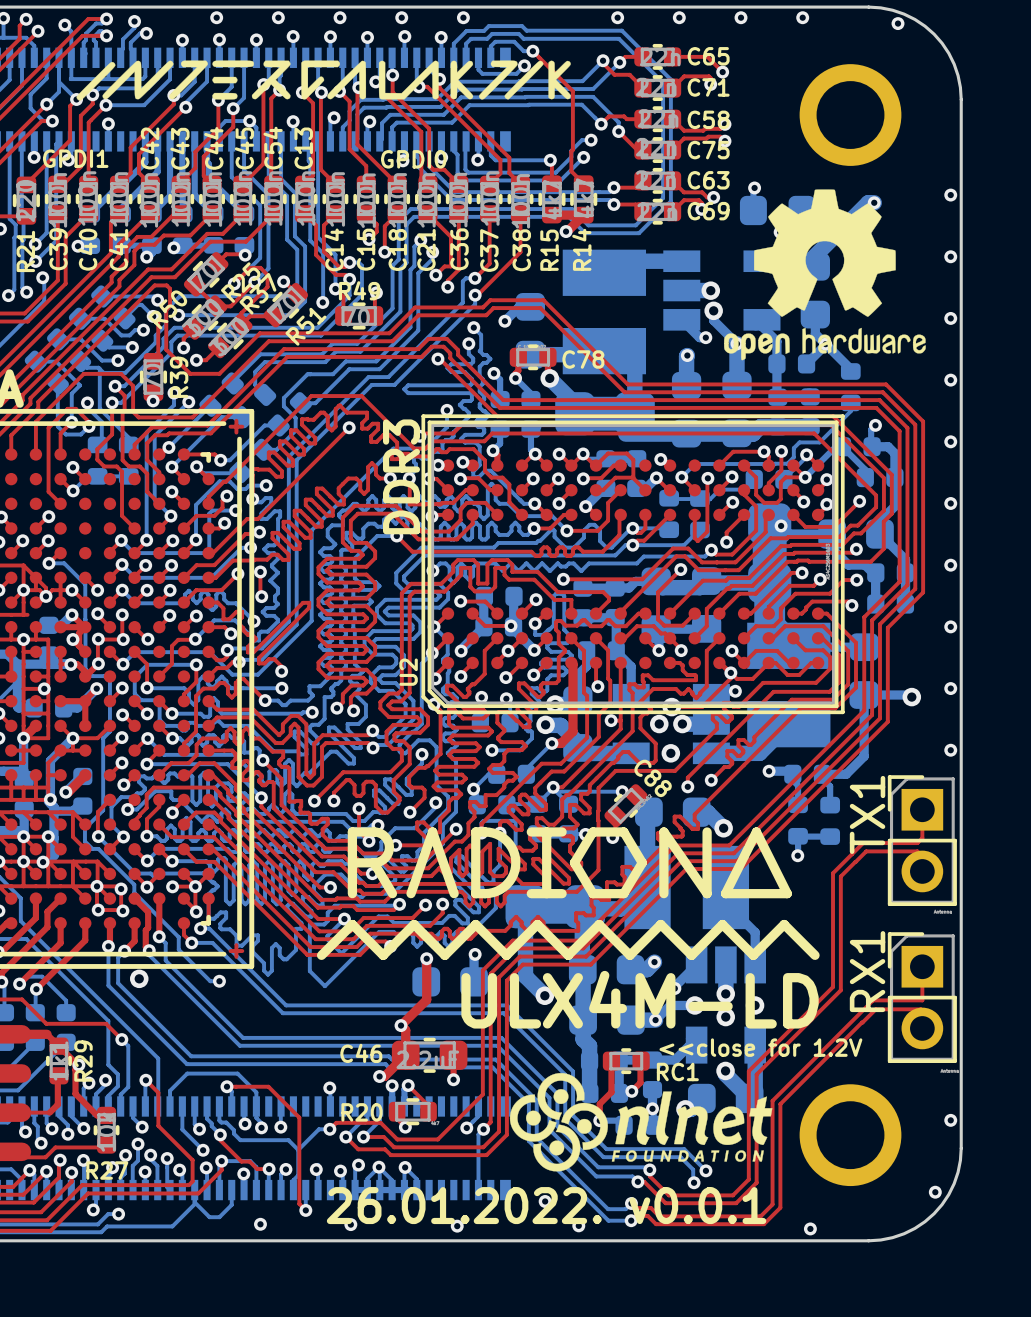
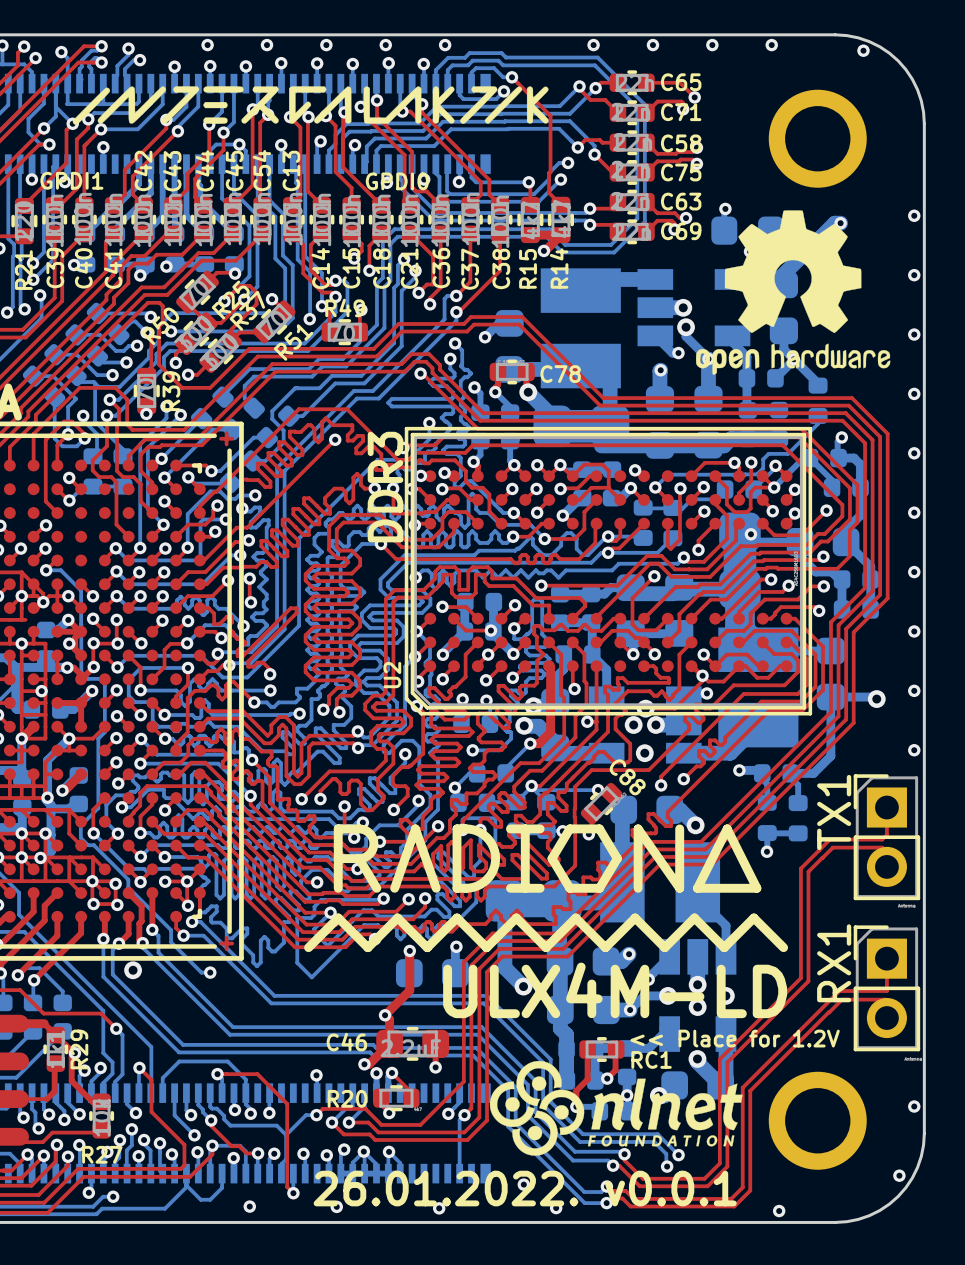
text: <<close for 1.2V (760, 1047) -> << Place for 1.2V (735, 1038)

